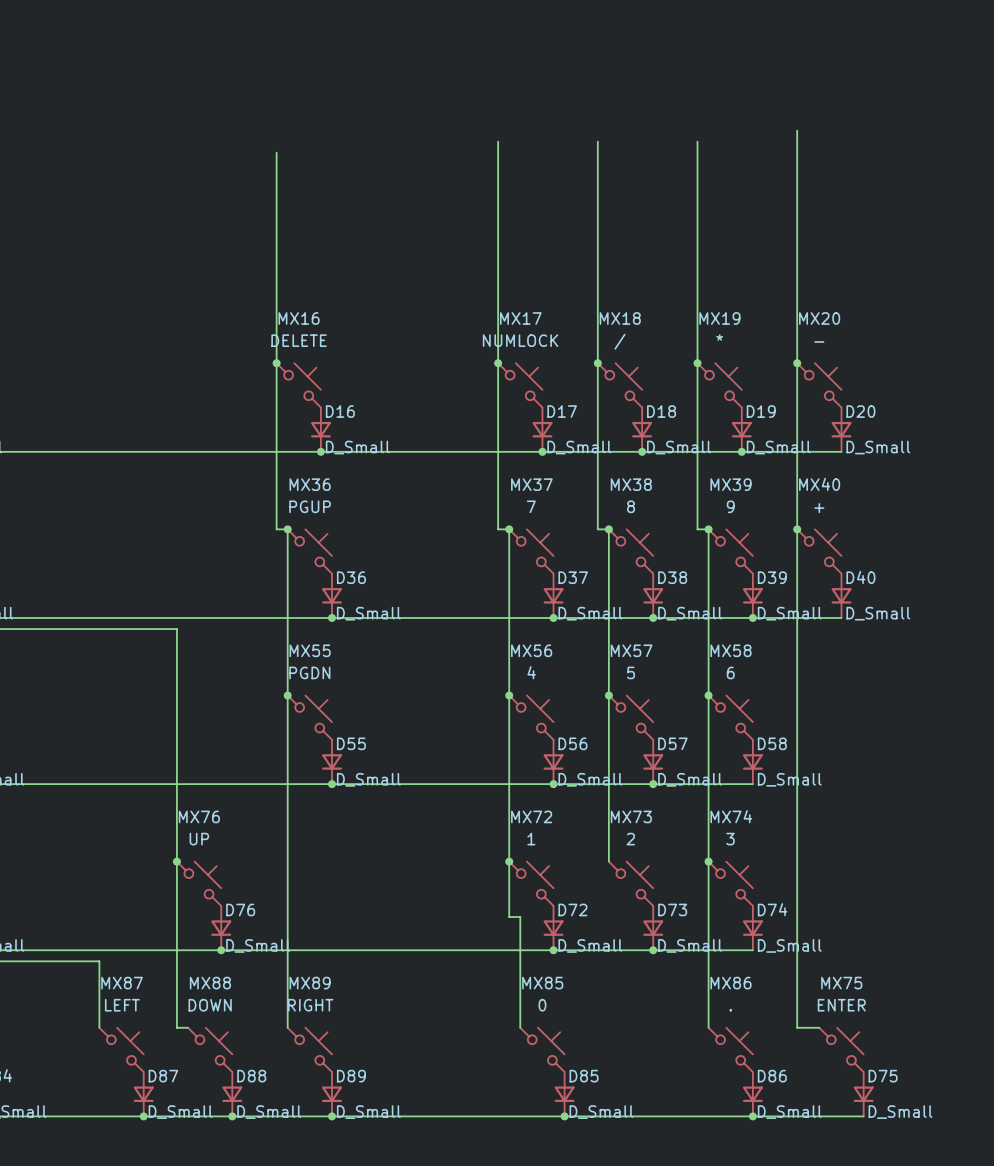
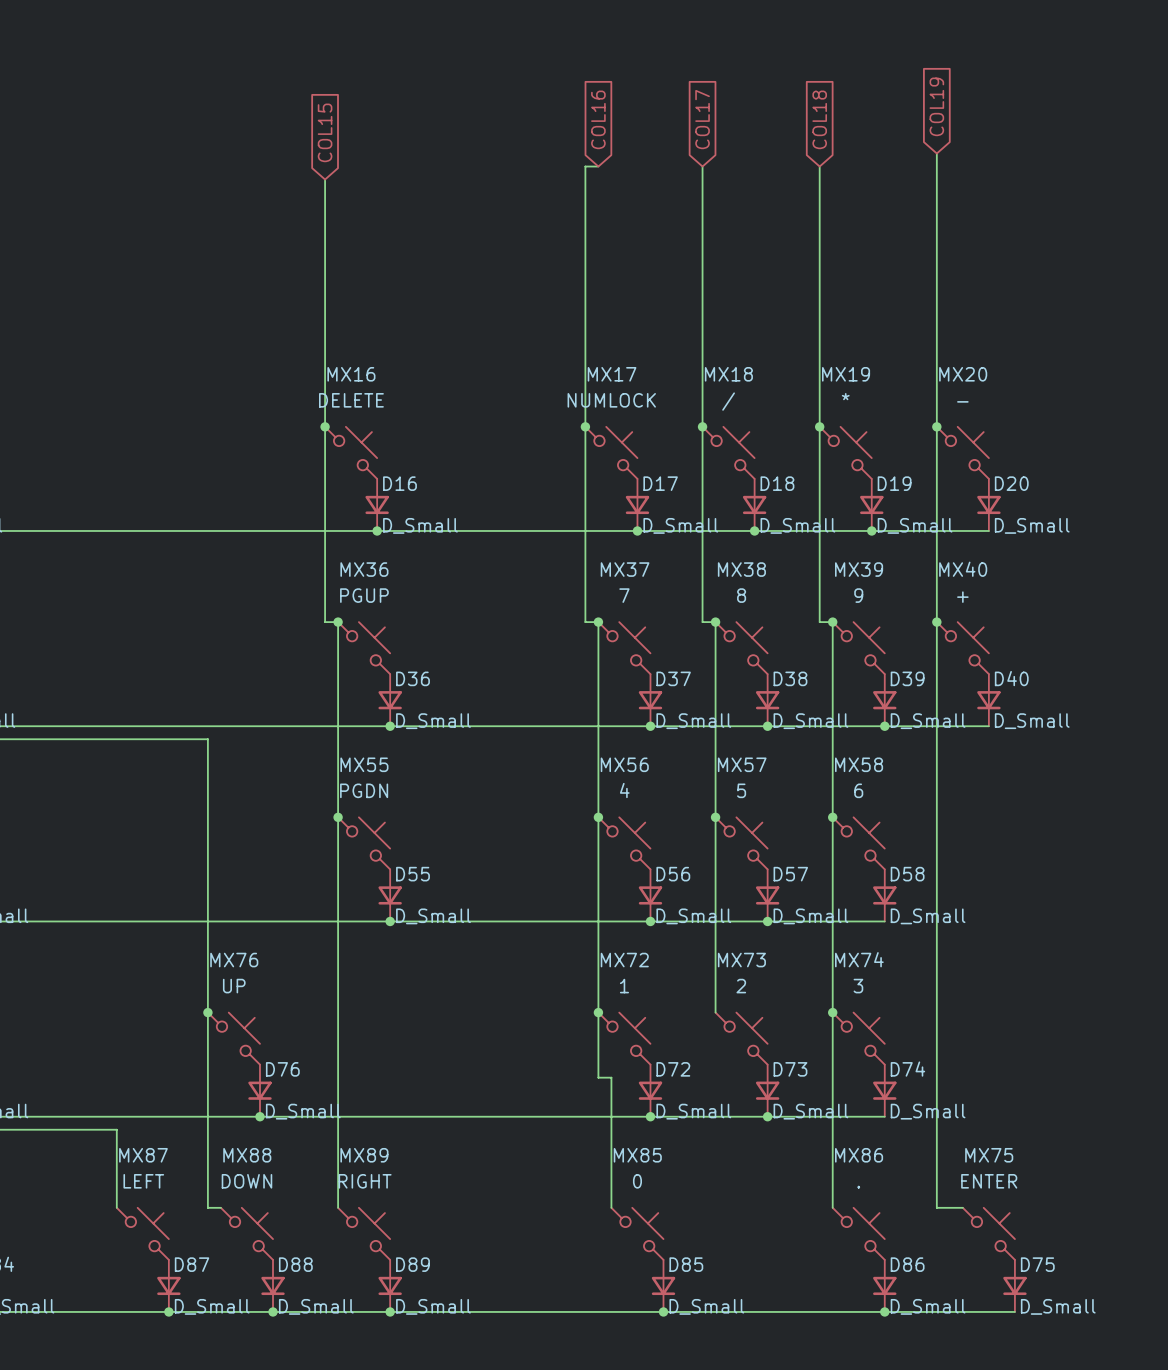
global label: none -> COL19 (936, 106)
global label: none -> COL16 (598, 119)
global label: none -> COL17 (702, 119)
global label: none -> COL18 (819, 119)
global label: none -> COL15 (325, 132)
wire: none -> (585, 166) (598, 166)

